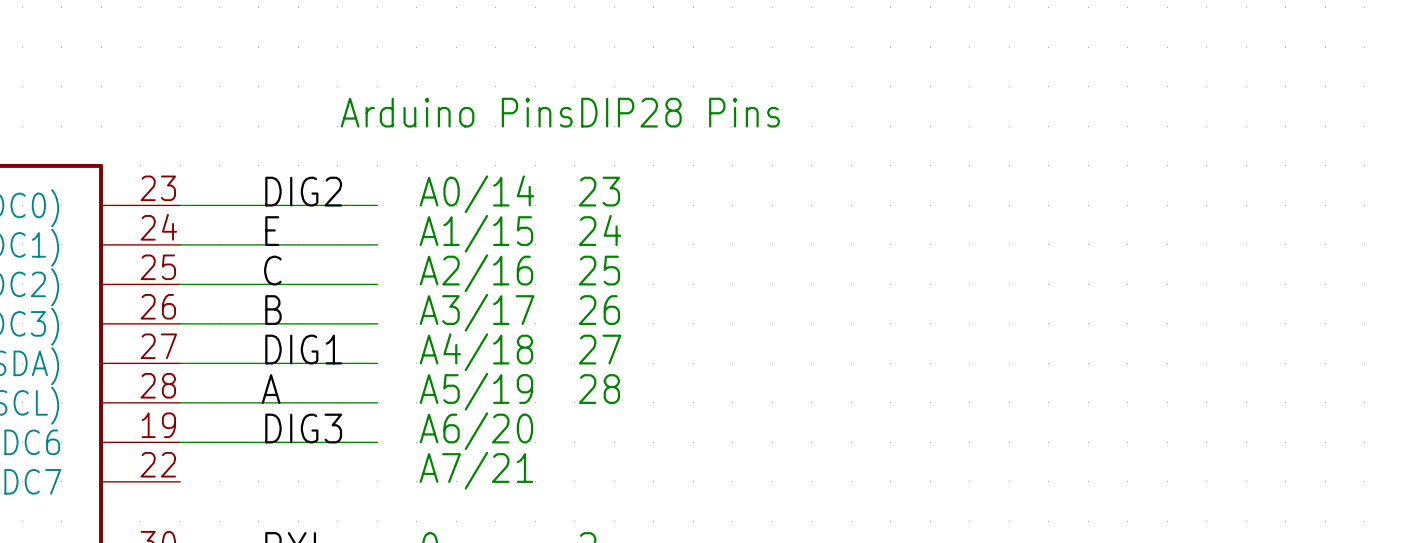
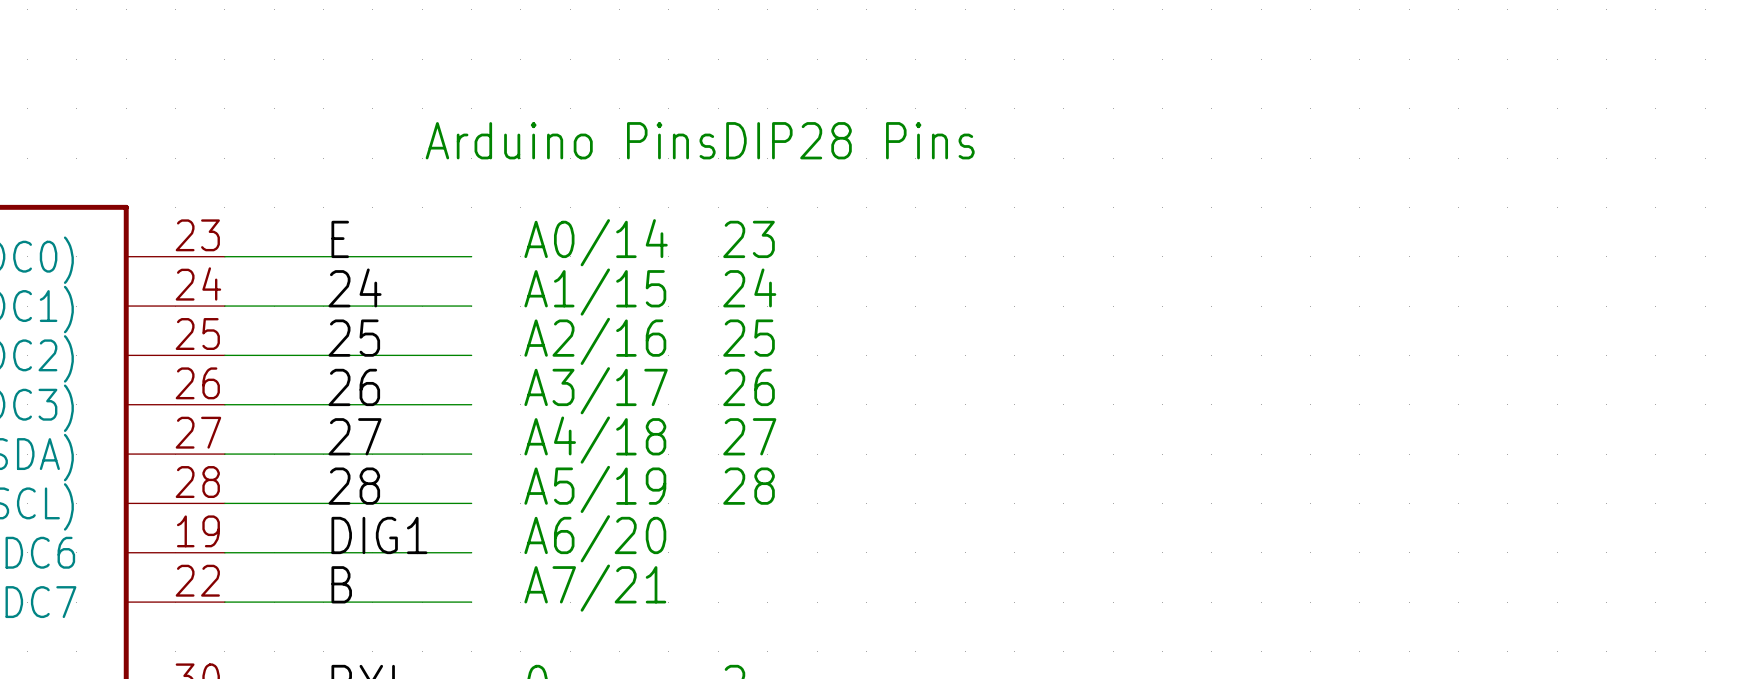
label: DIG2 (303, 191) -> E (340, 239)
label: E (272, 231) -> 24 (355, 287)
label: C (272, 270) -> 25 (354, 338)
label: B (273, 310) -> 26 (354, 387)
label: DIG1 (303, 349) -> 27 (355, 436)
label: A (271, 389) -> 28 (354, 486)
label: DIG3 (303, 428) -> DIG1 (379, 535)
label: none -> B (341, 584)
wire: none -> (224, 602) (471, 602)

